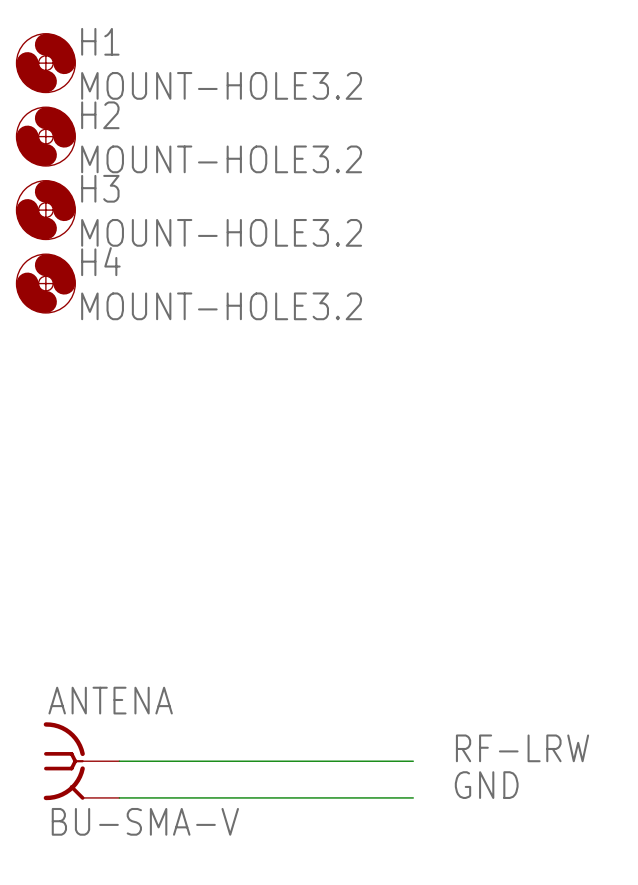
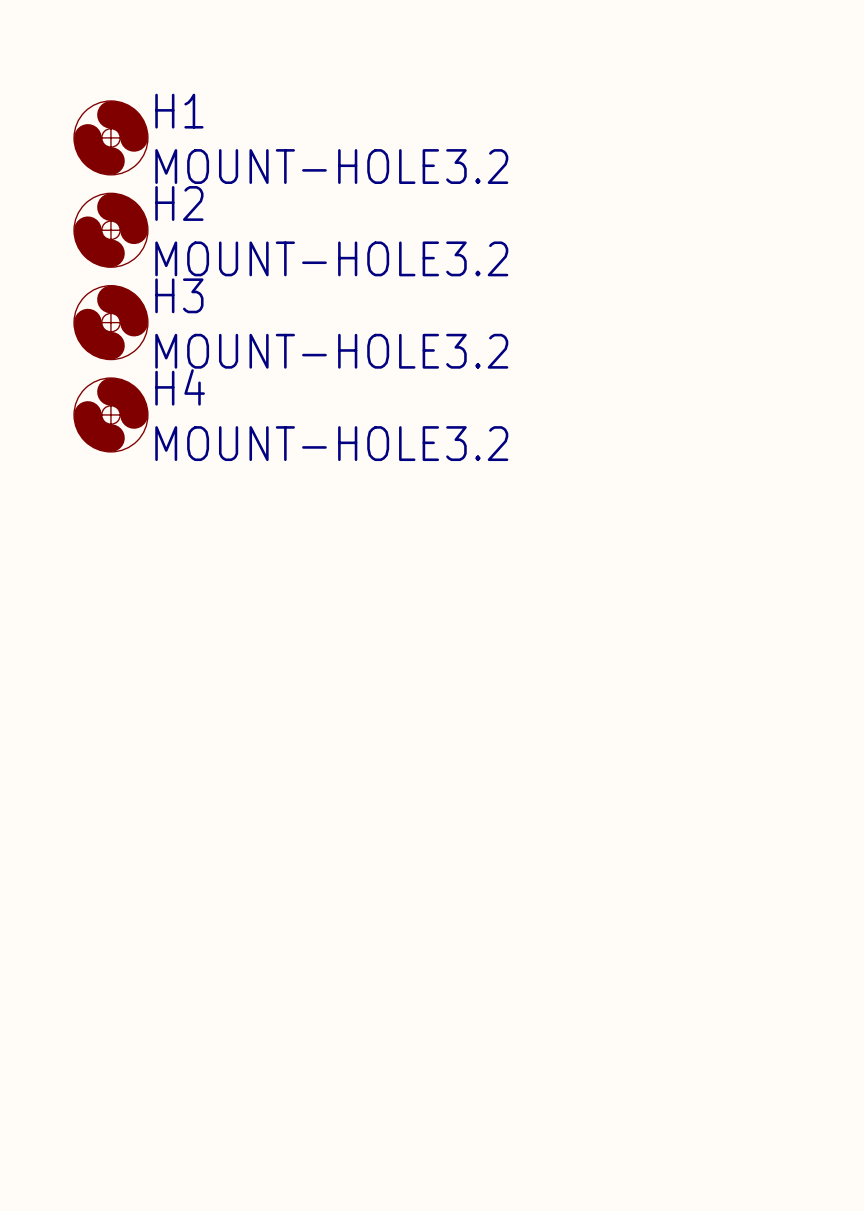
label: RF-LRW (522, 748) -> none
ANTENA: BU-SMA-V (81, 761) -> none
wire: (119, 761) (413, 761) -> none
label: GND (486, 785) -> none
wire: (119, 797) (413, 797) -> none

